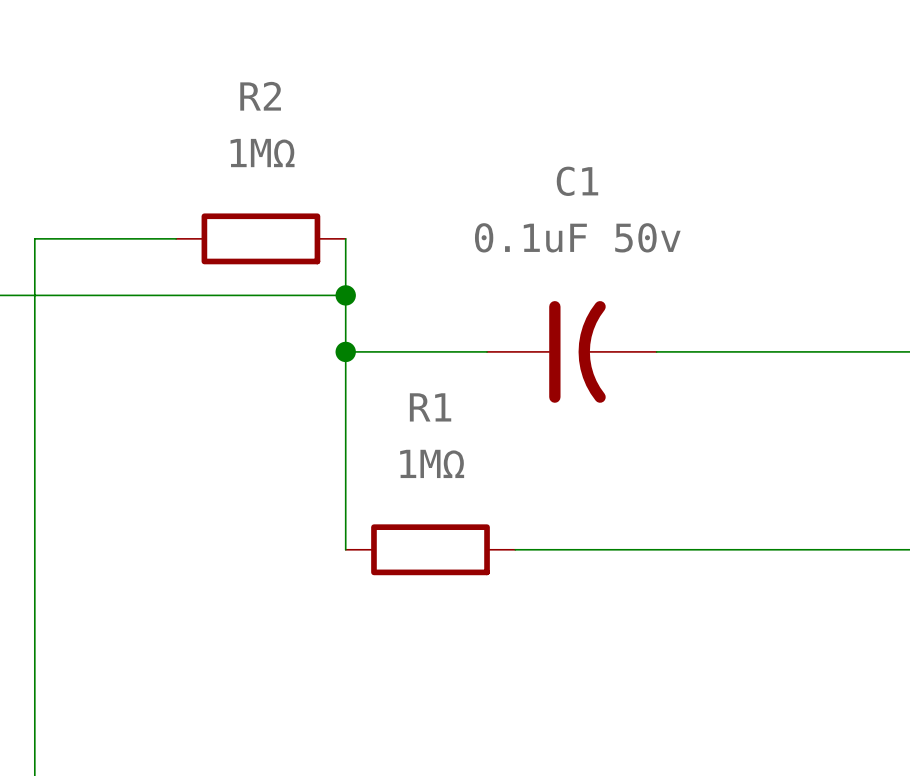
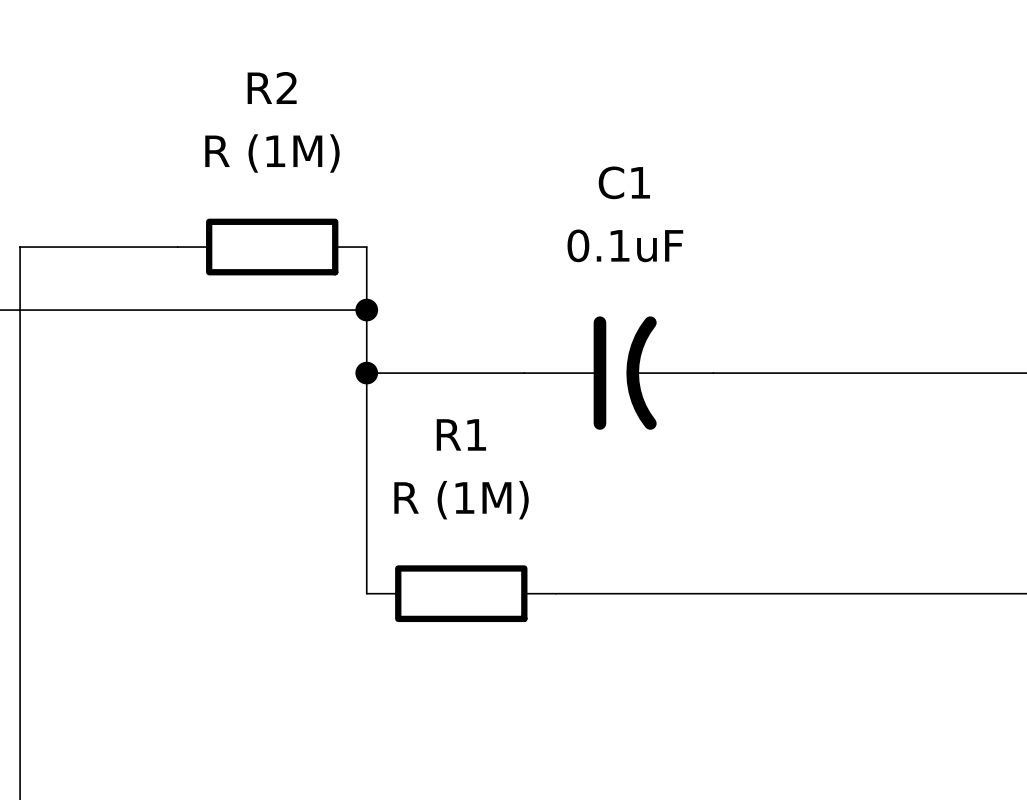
R2 value: 1MΩ (262, 153) -> R (1M) (272, 153)
C1 value: 0.1uF 50v (577, 237) -> 0.1uF (625, 245)
R1 value: 1MΩ (432, 463) -> R (1M) (461, 500)

